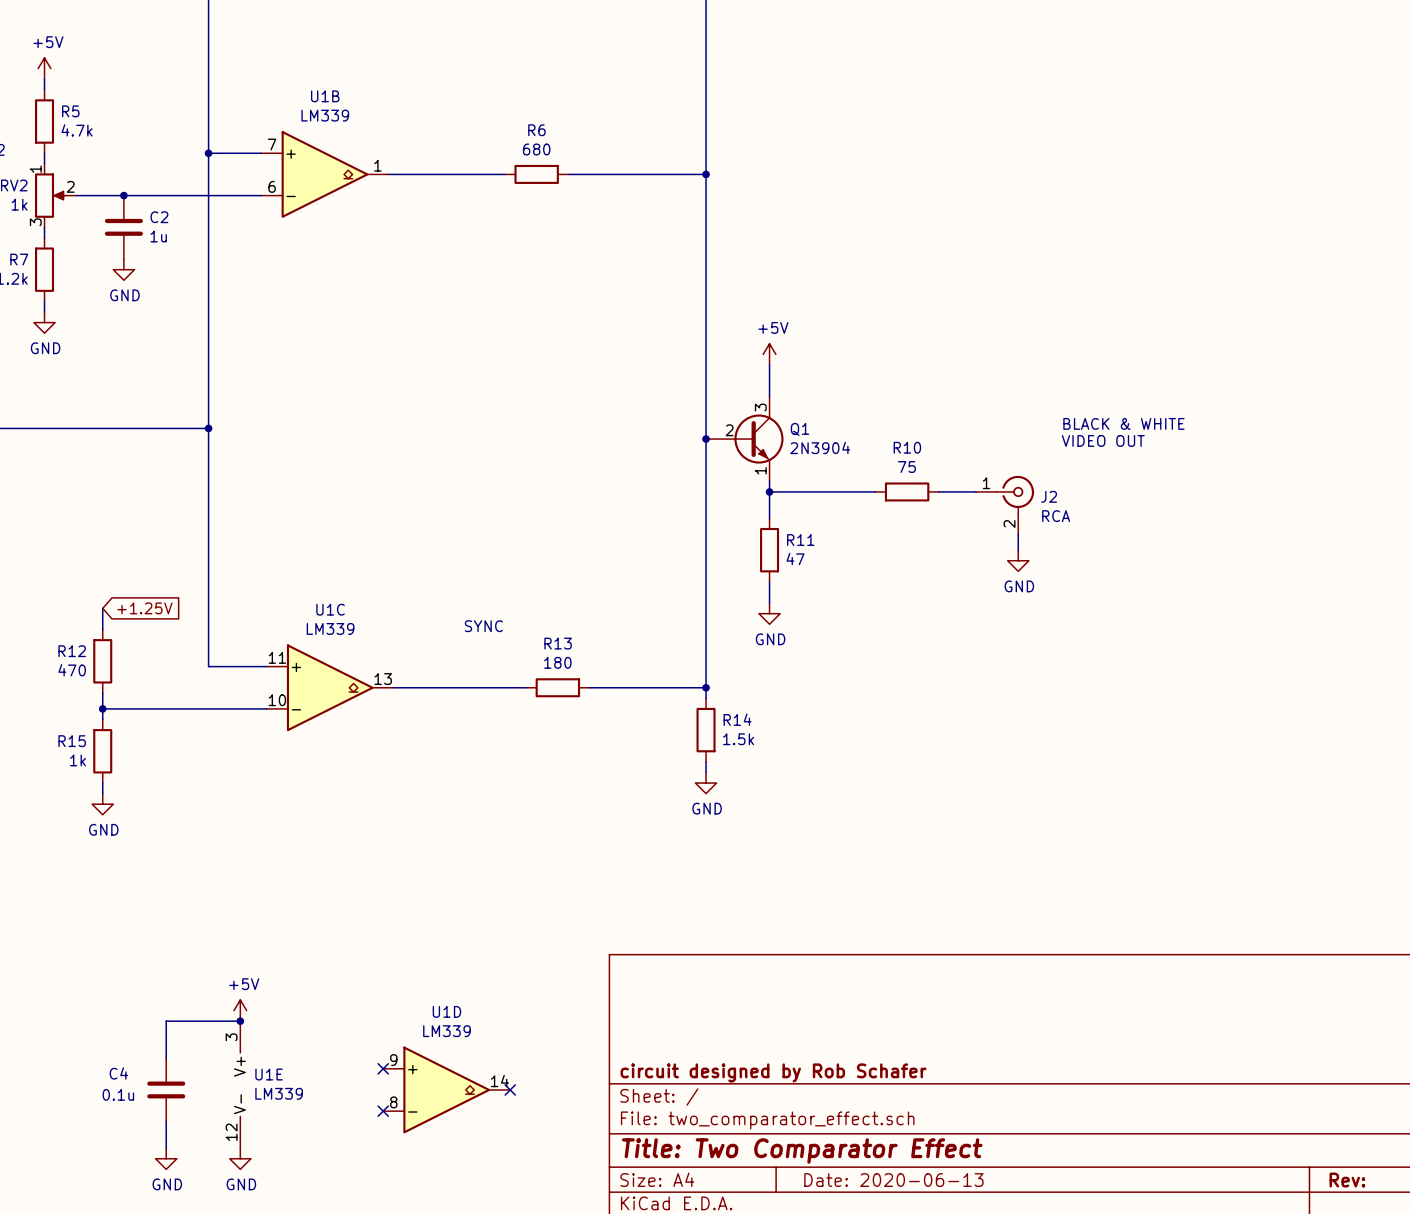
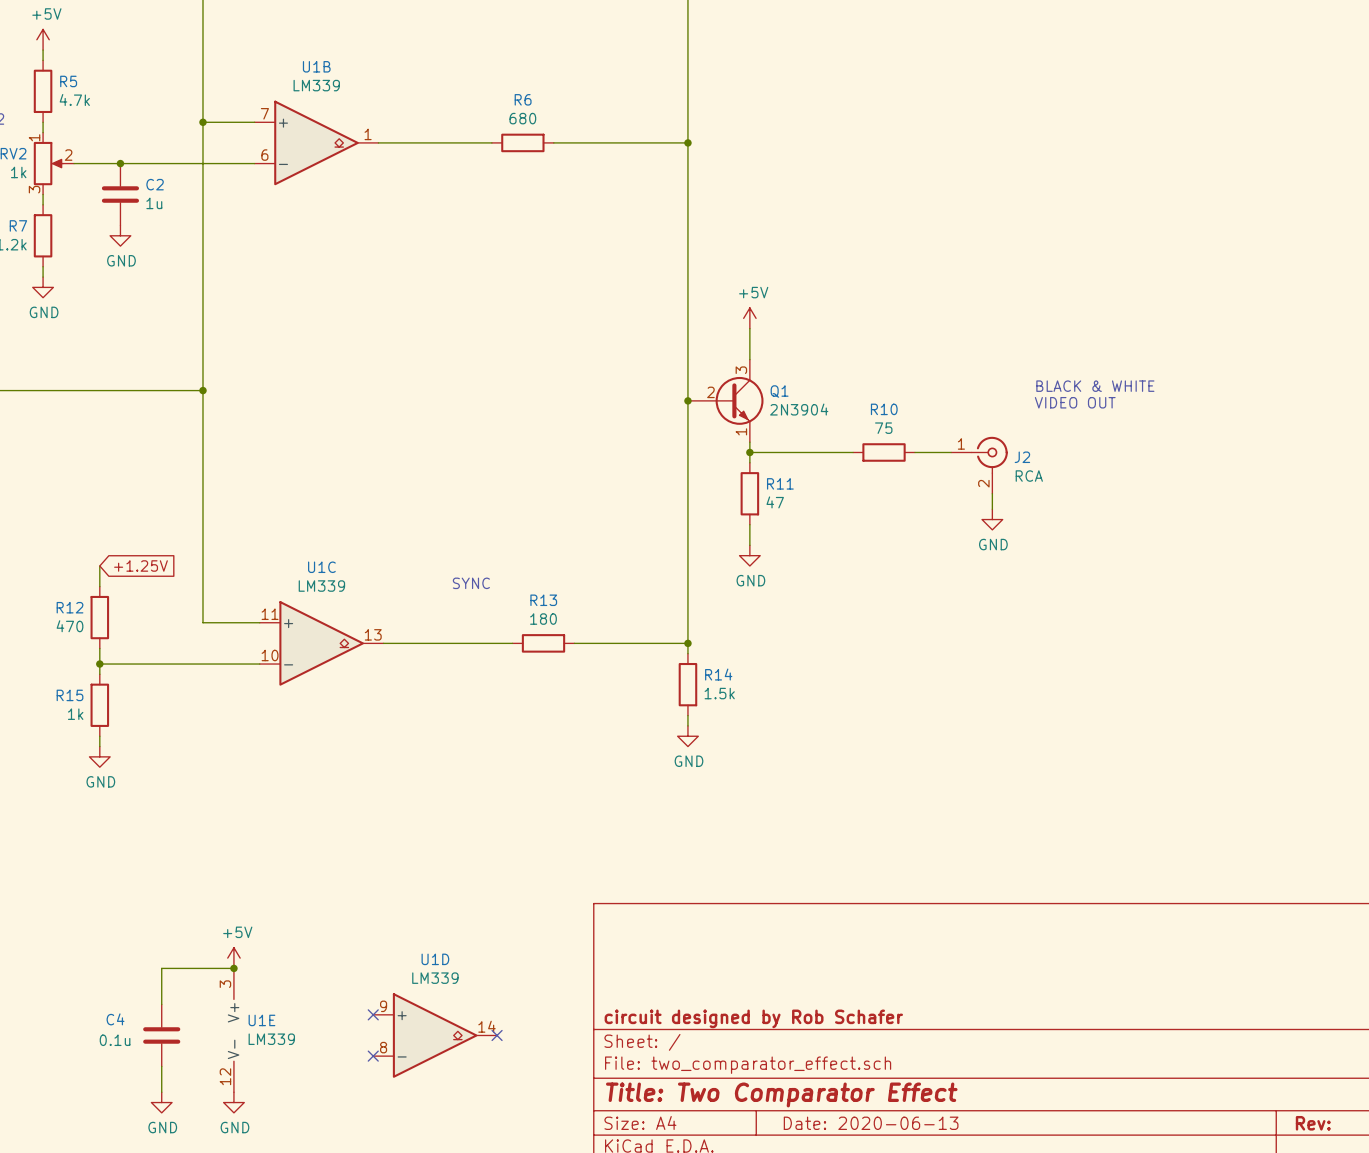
R11 position: (769, 550) -> (749, 493)
power symbol position: GND (769, 613) -> GND (749, 555)

